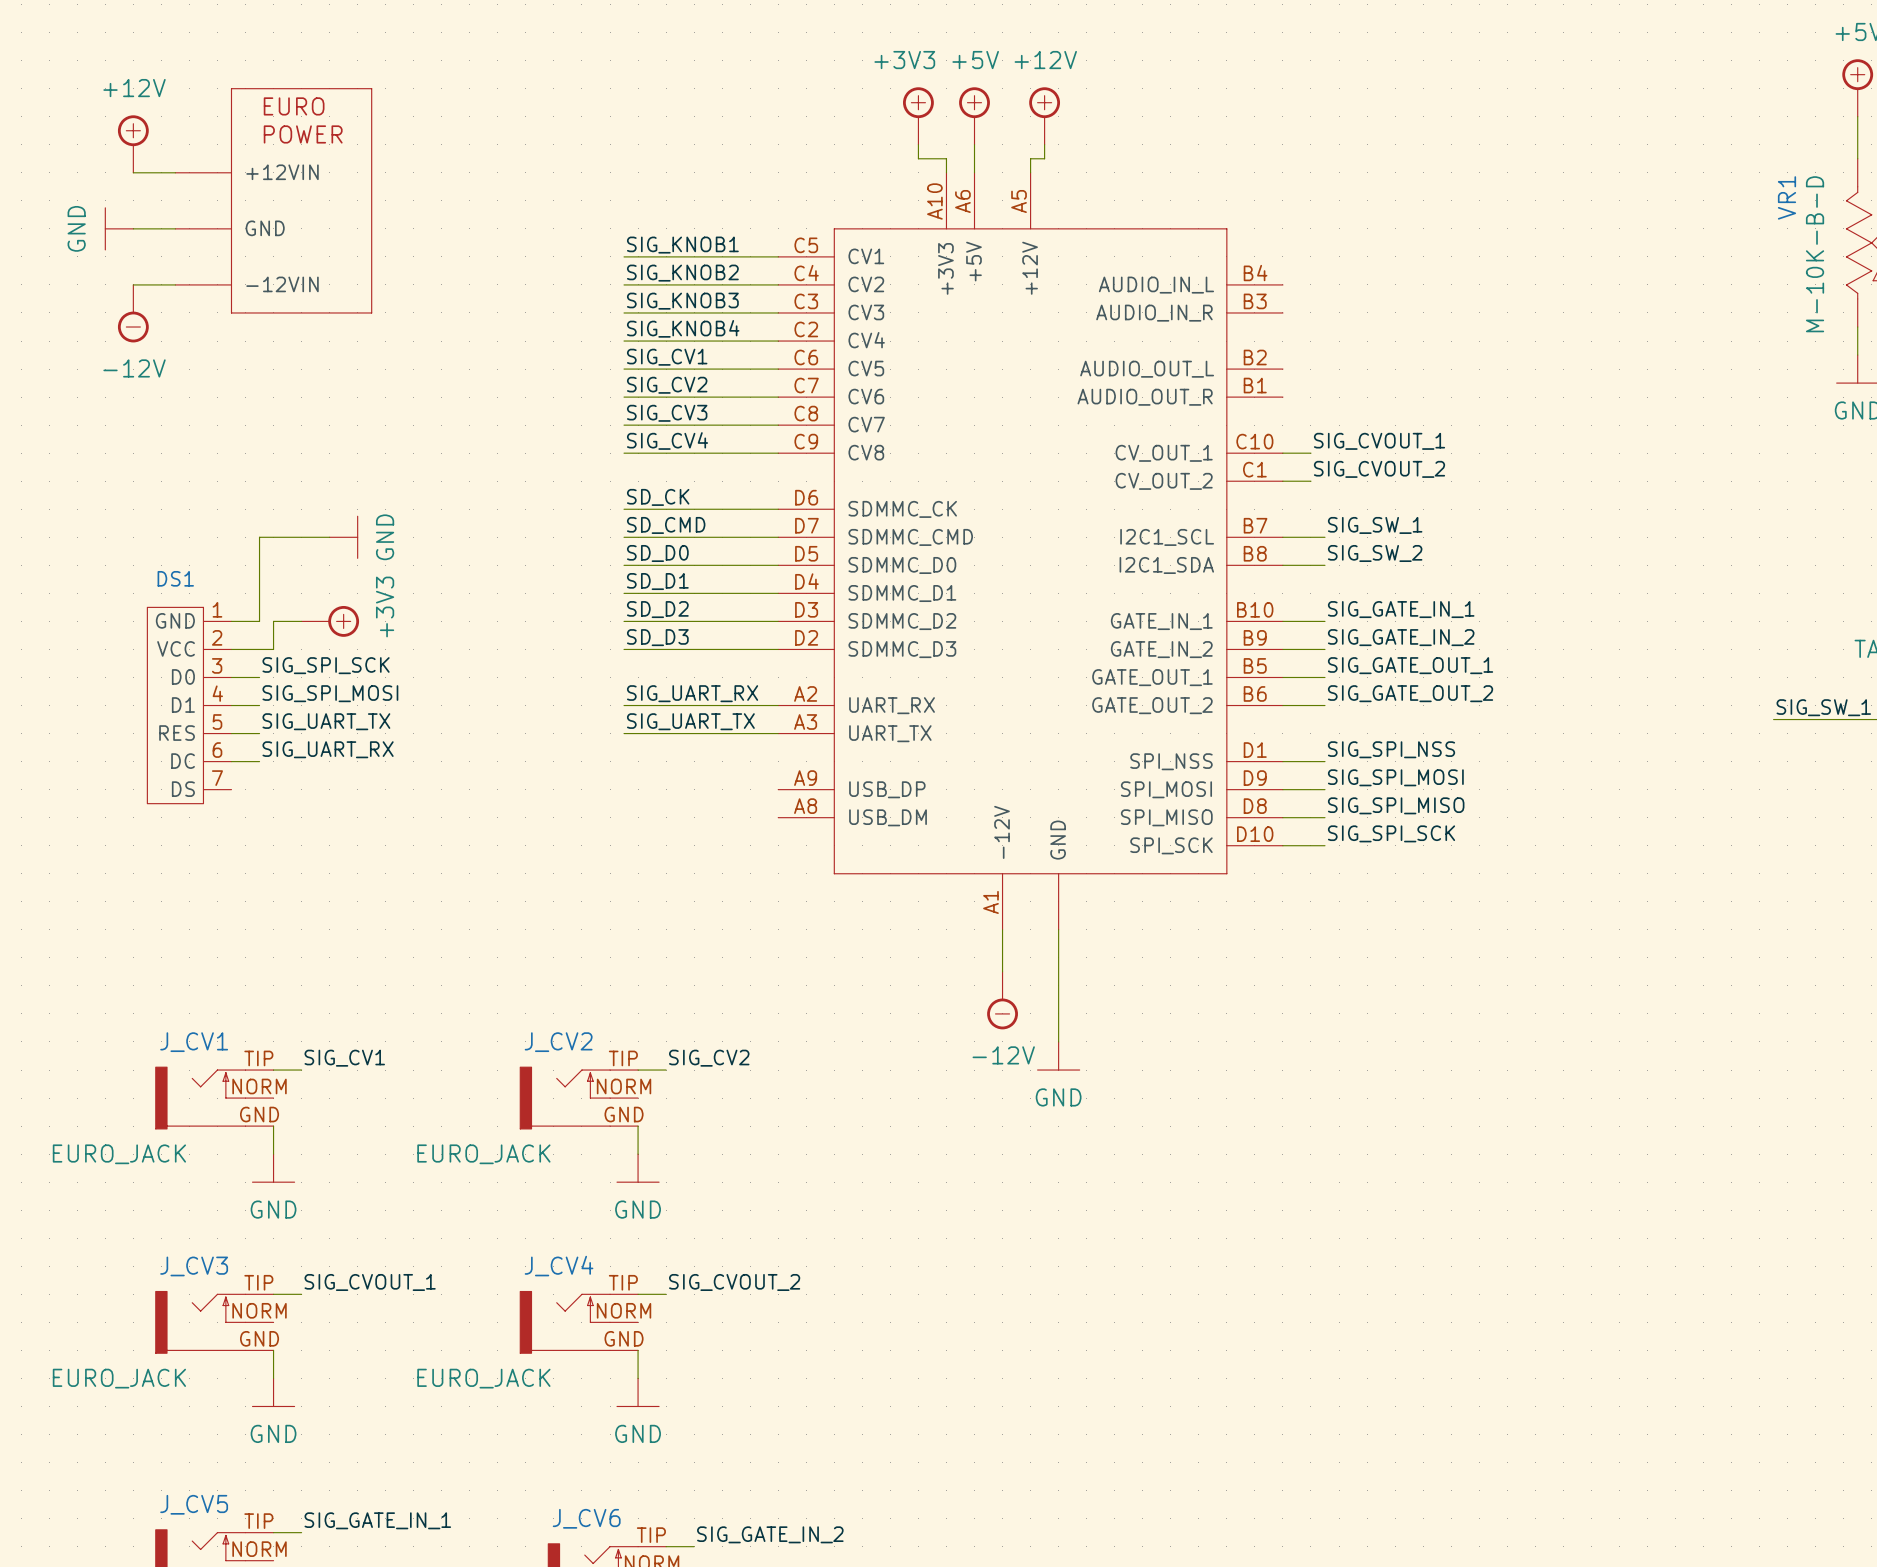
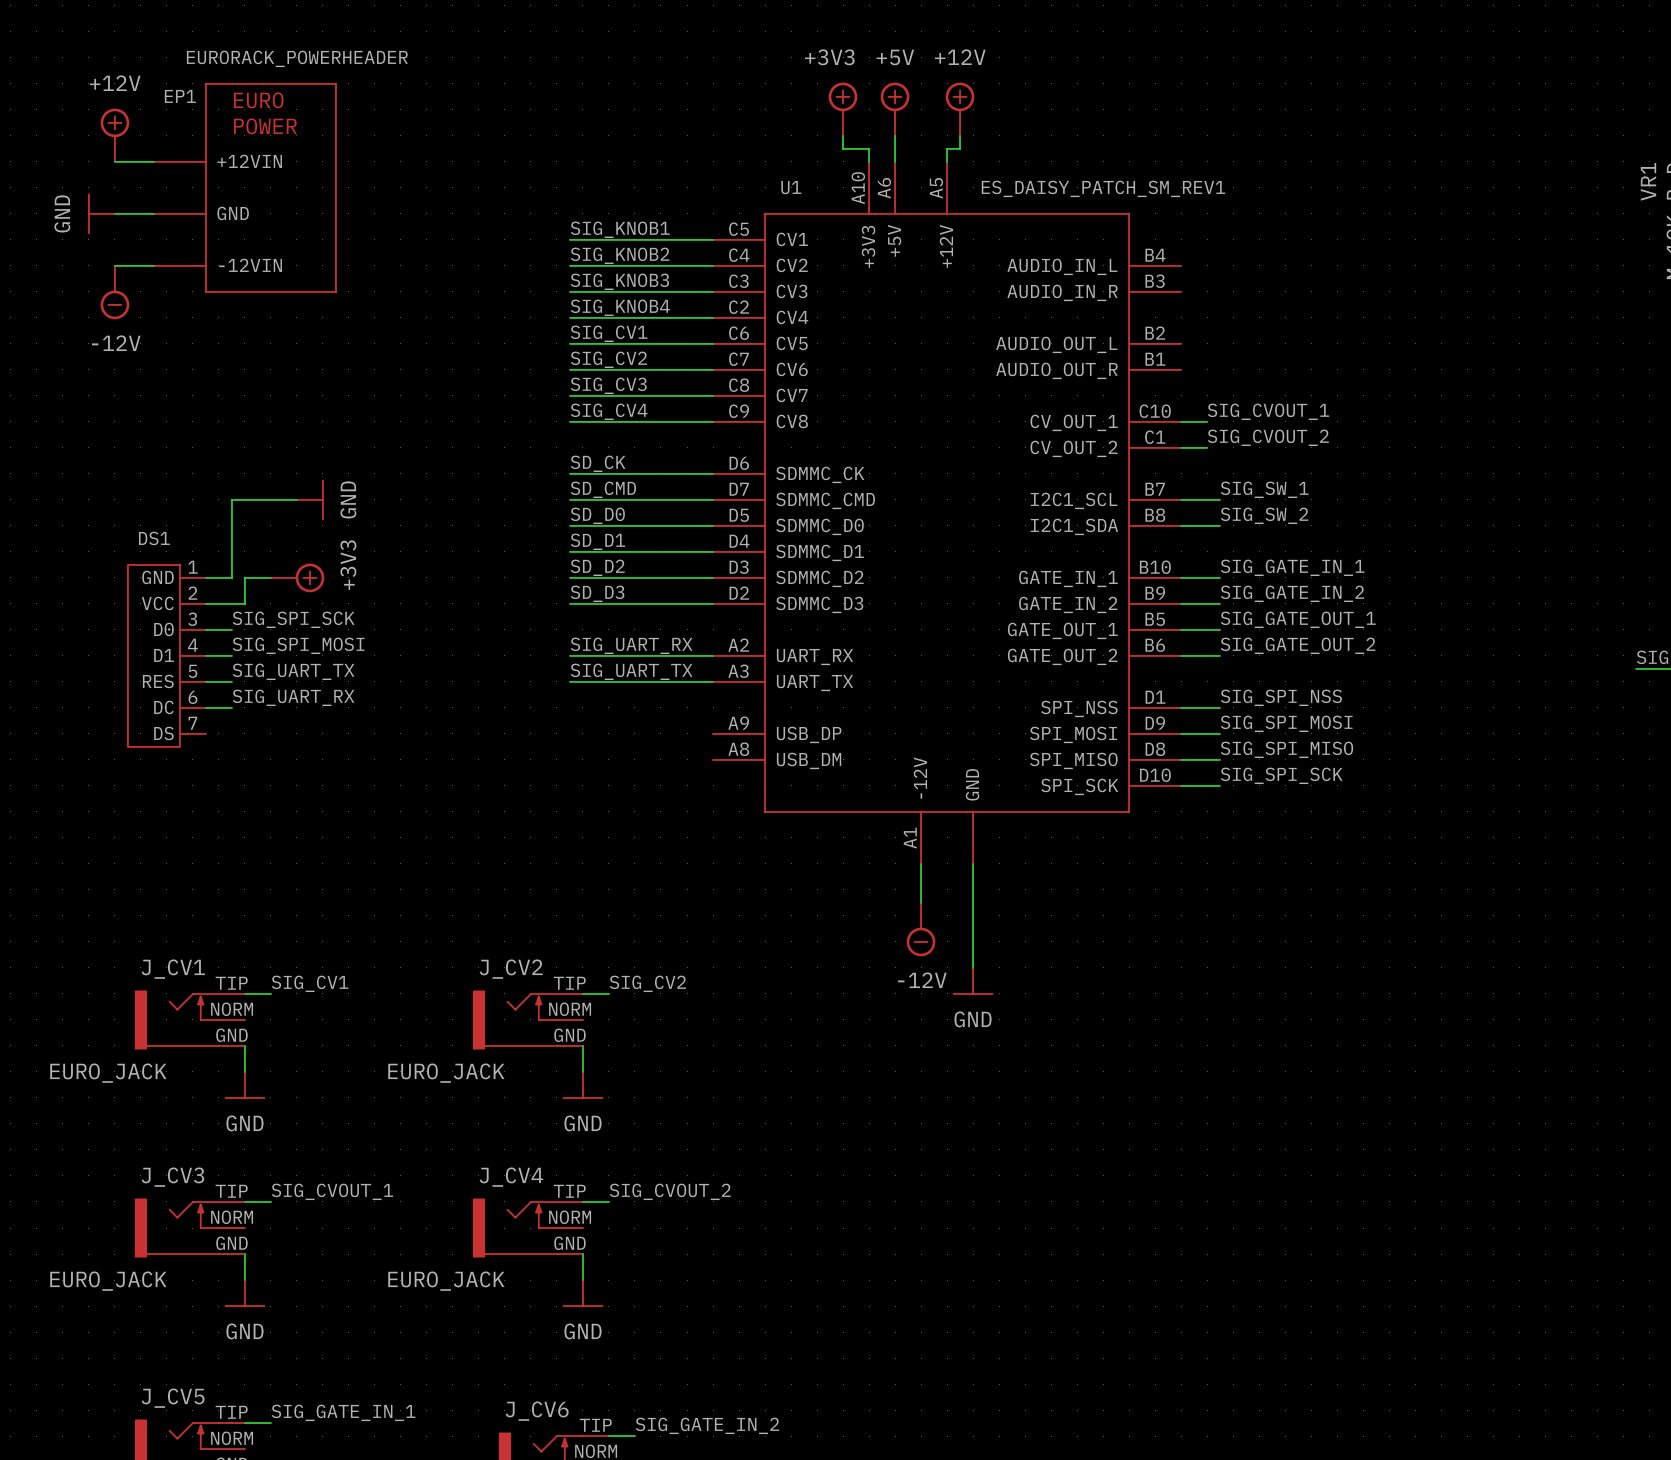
EP1 value: none -> EURORACK_POWERHEADER (297, 58)
EP1 name: none -> EP1 (180, 96)
U1 name: none -> U1 (791, 187)
U1 value: none -> ES_DAISY_PATCH_SM_REV1 (1103, 188)

